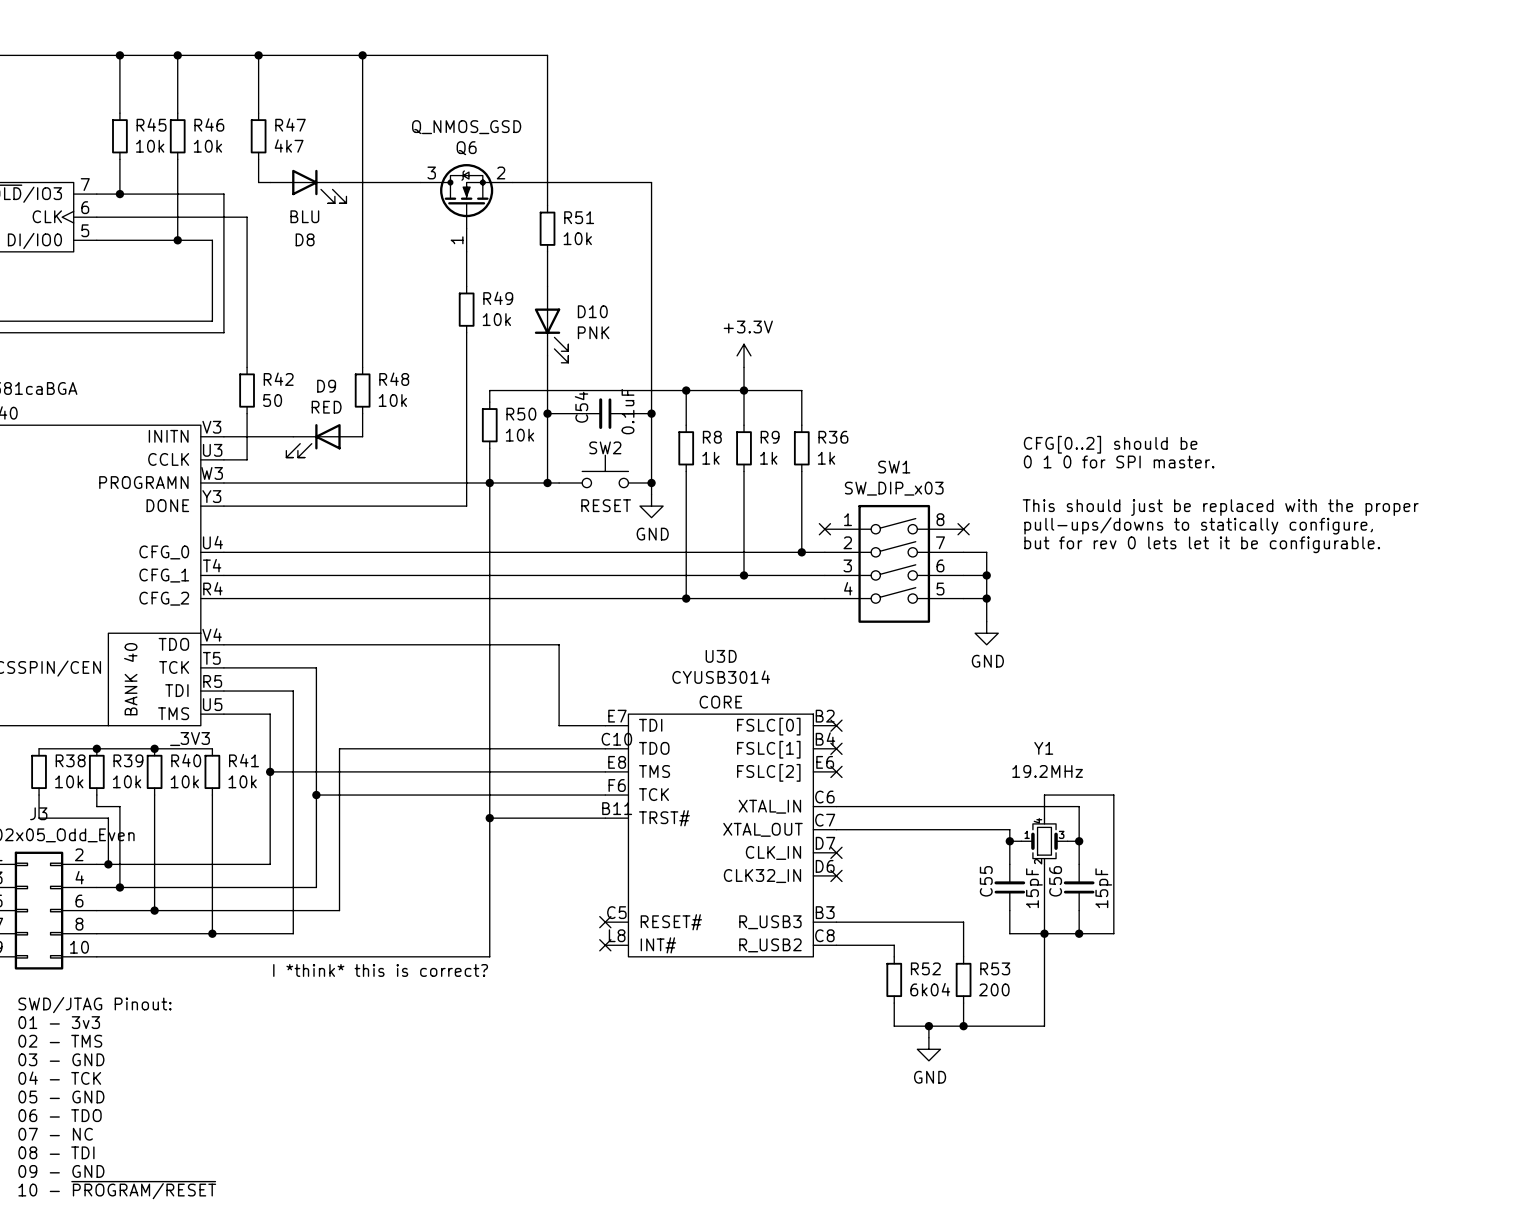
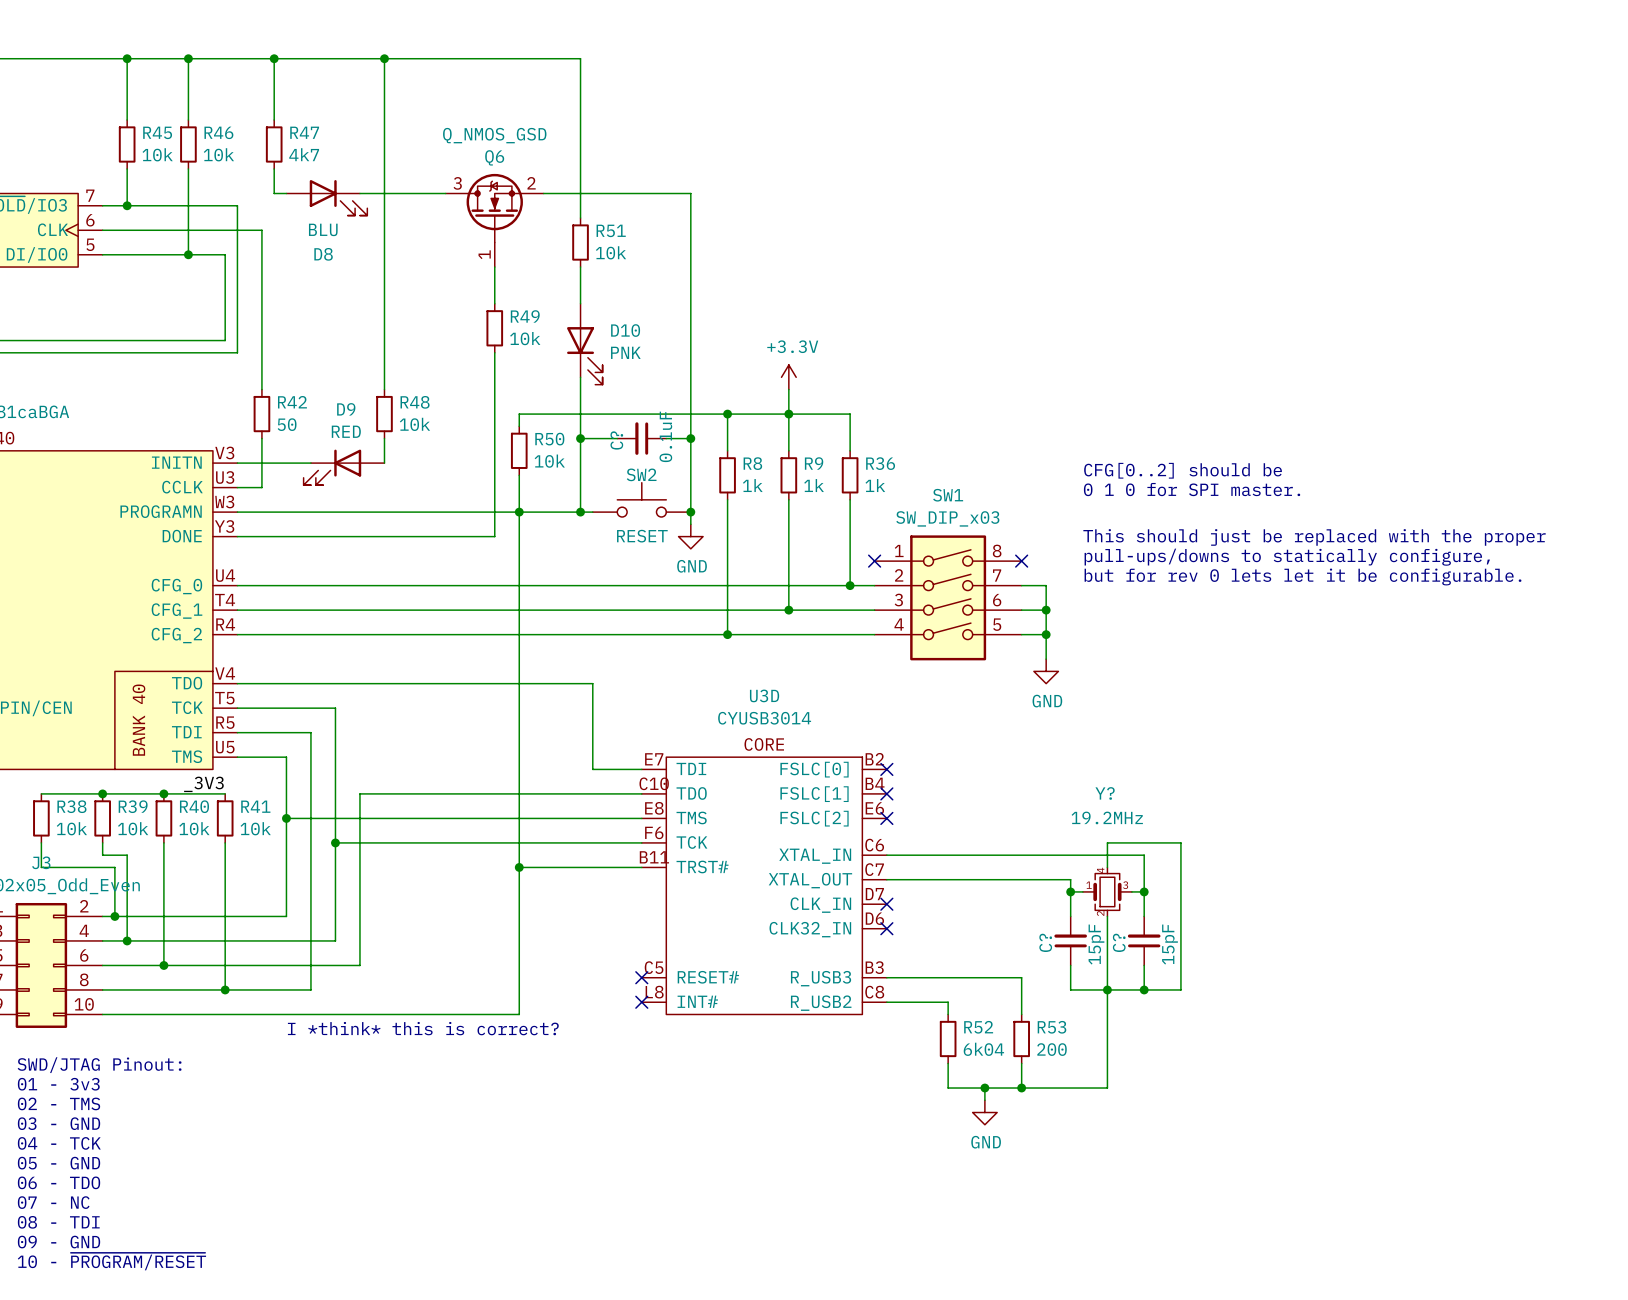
C54 name: C54 (581, 407) -> C? (616, 440)
Y1 name: Y1 (1043, 748) -> Y? (1105, 793)
C55 name: C55 (986, 881) -> C? (1045, 942)
C56 name: C56 (1055, 881) -> C? (1119, 942)

